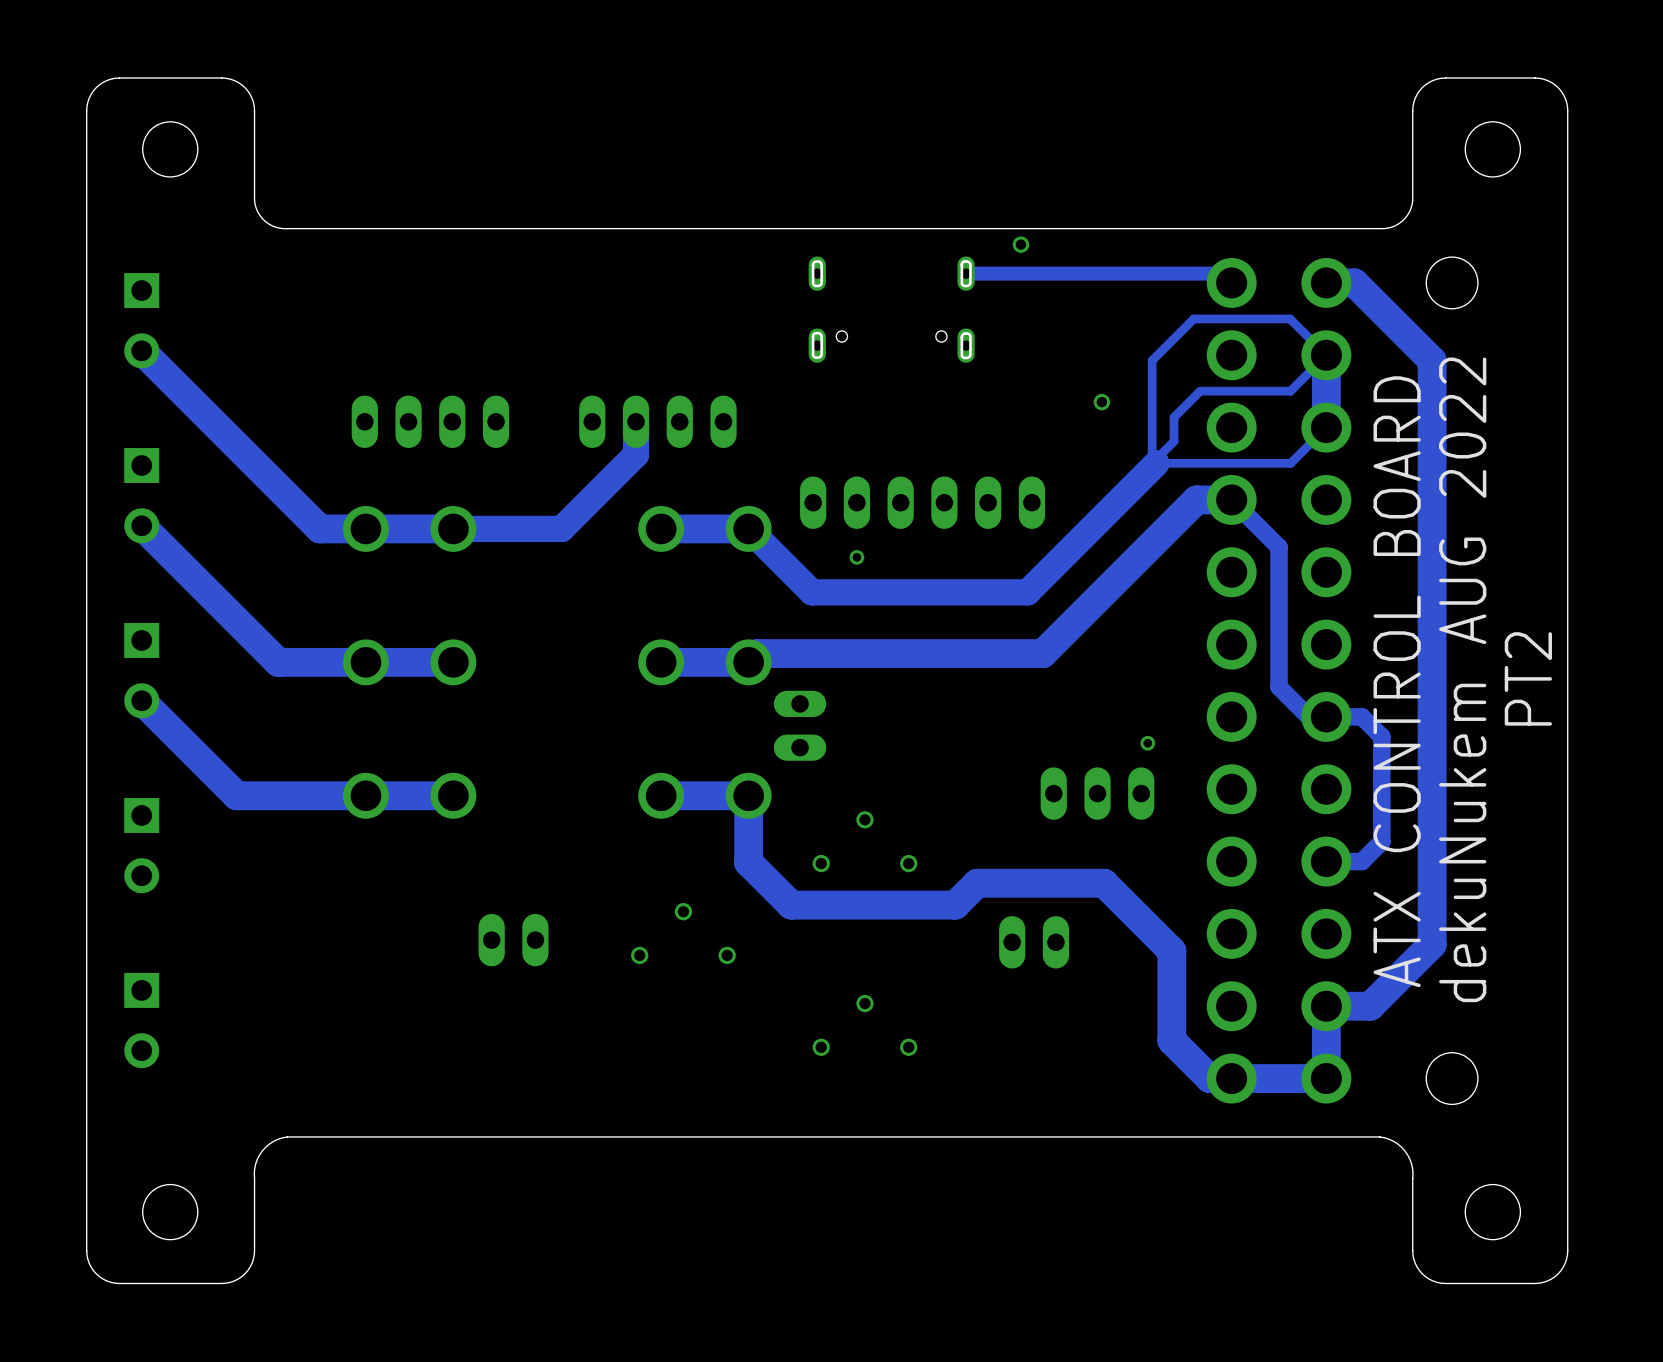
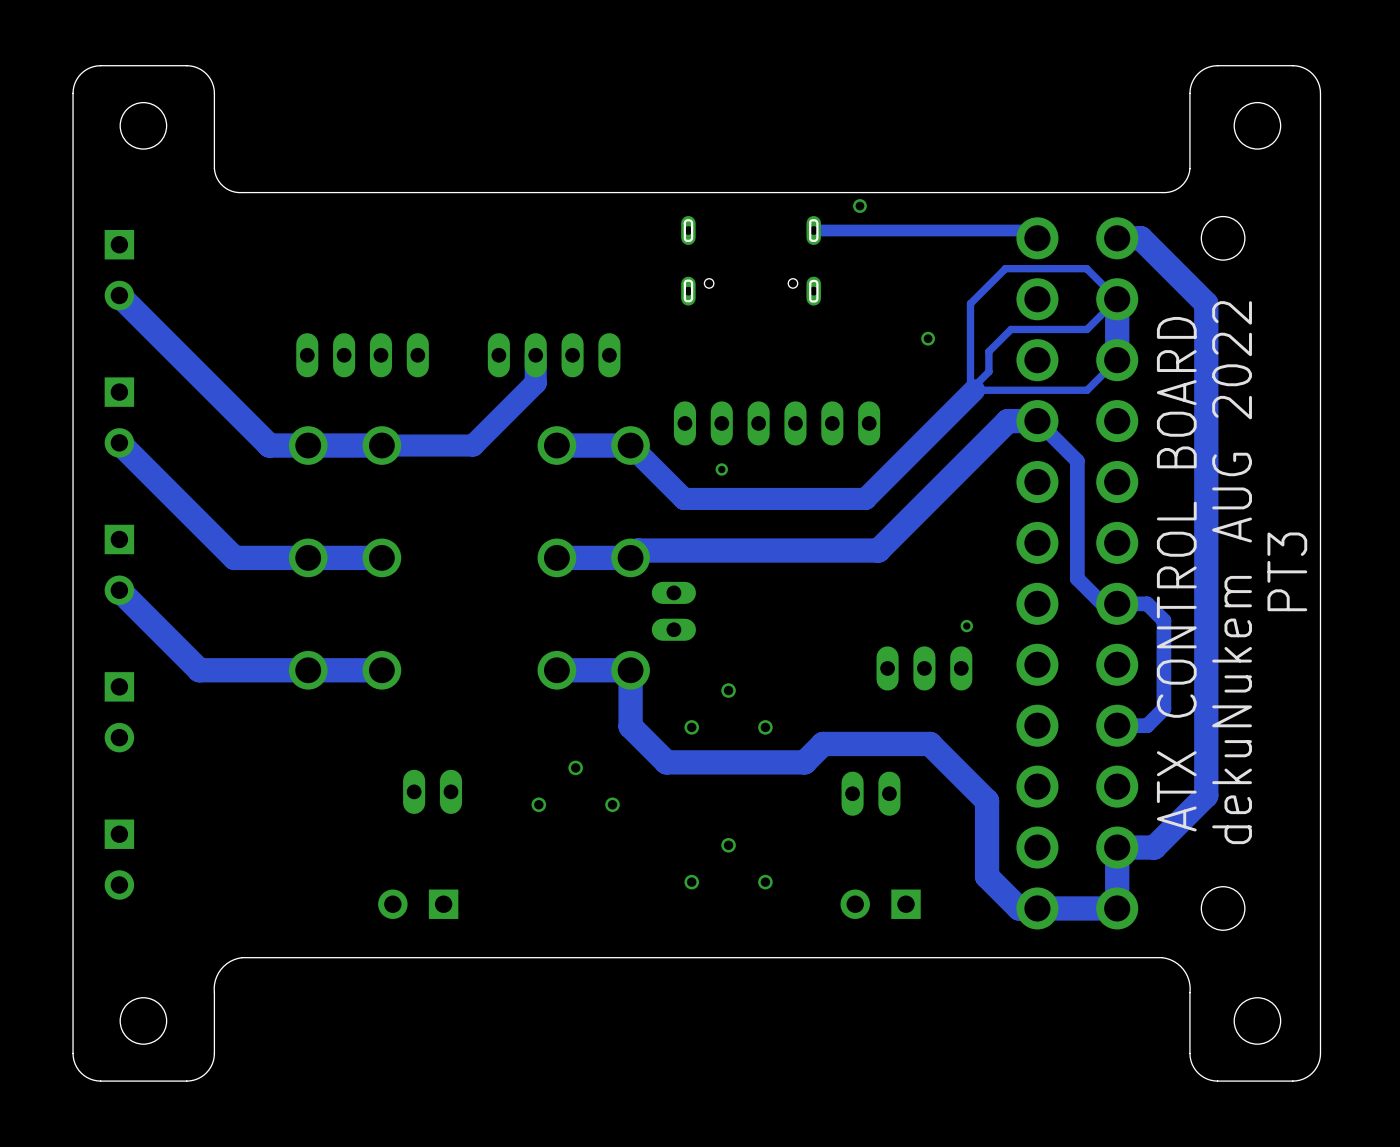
text: PT2 (1528, 678) -> PT3 (1287, 571)
part: none -> (418, 904)
part: none -> (880, 904)

